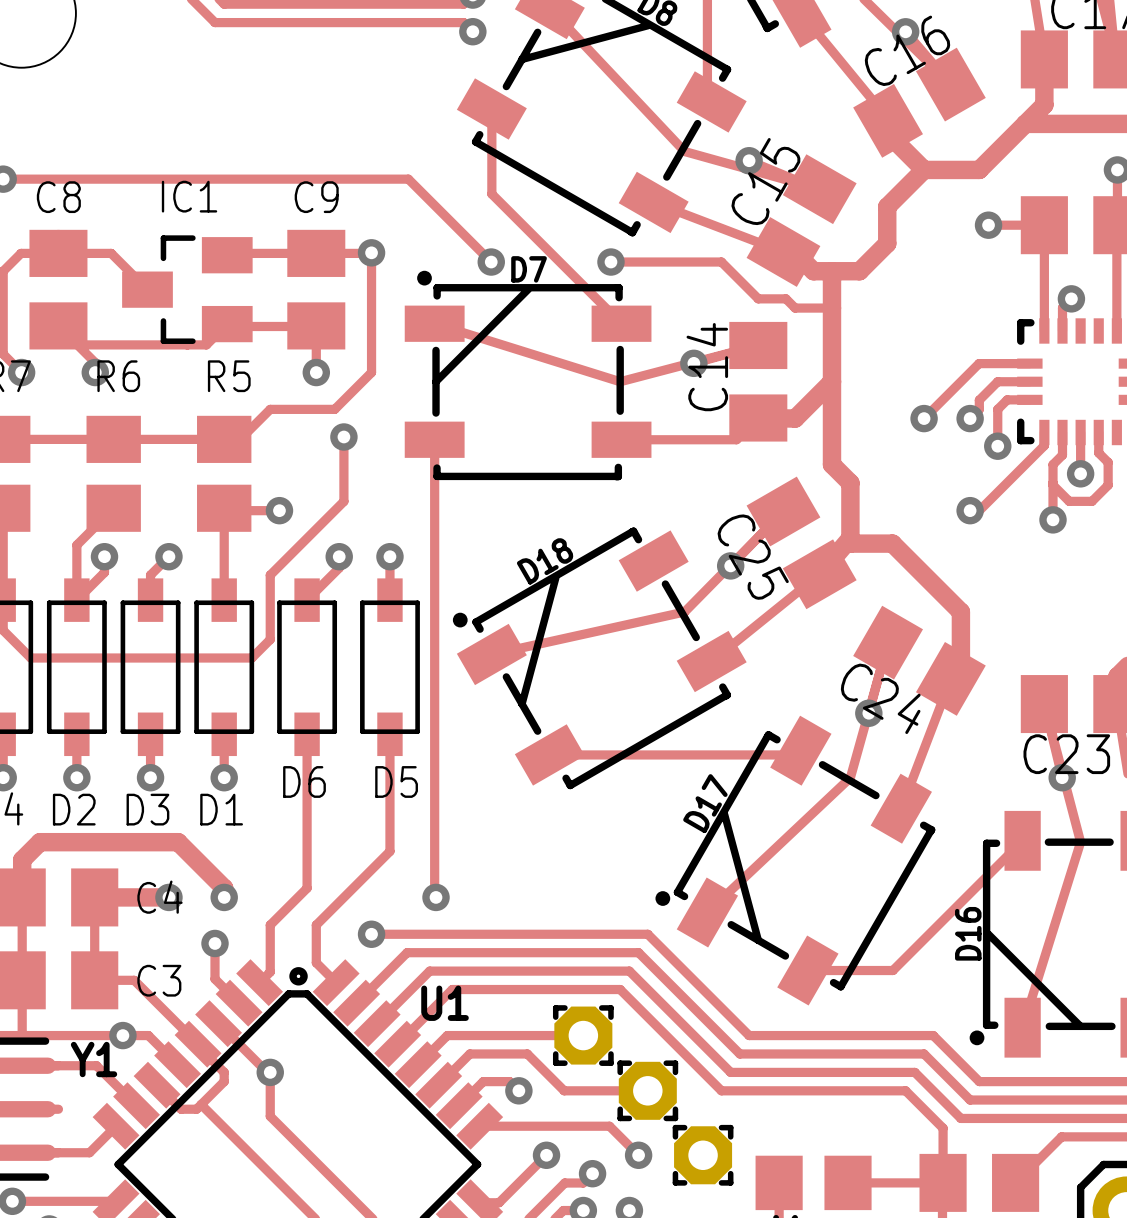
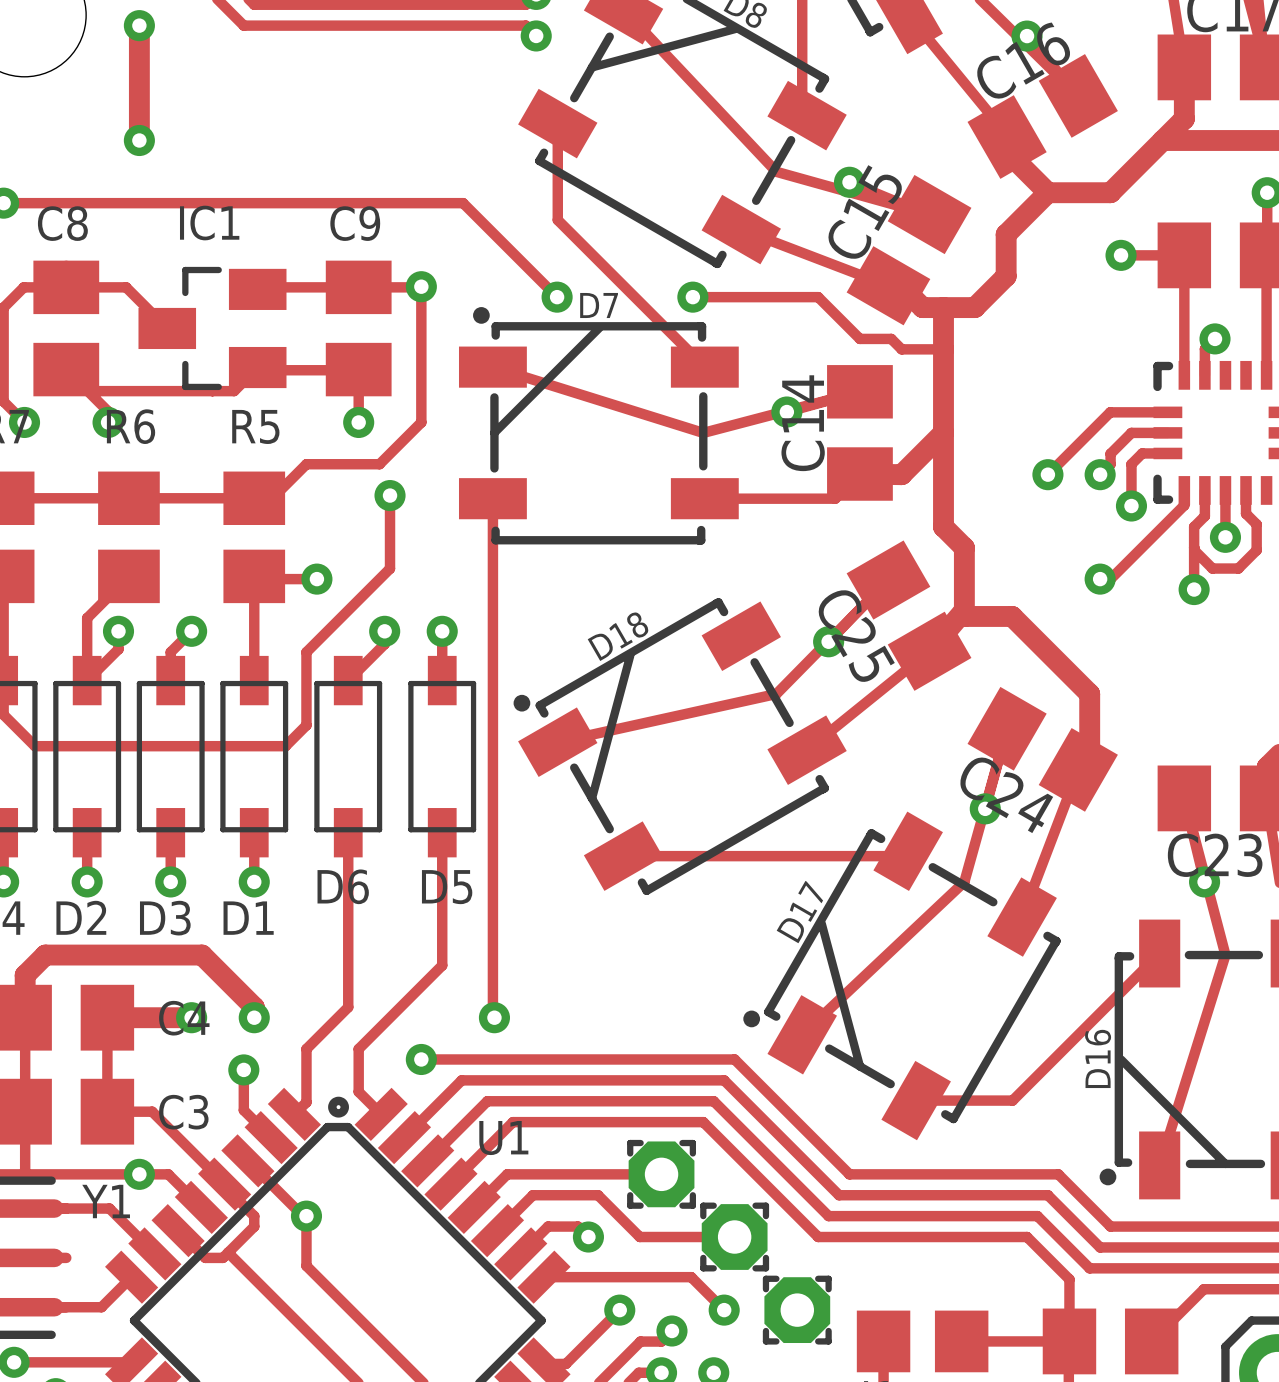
track: none -> (139, 25) (139, 140)
via: none -> (139, 25)
via: none -> (139, 140)

